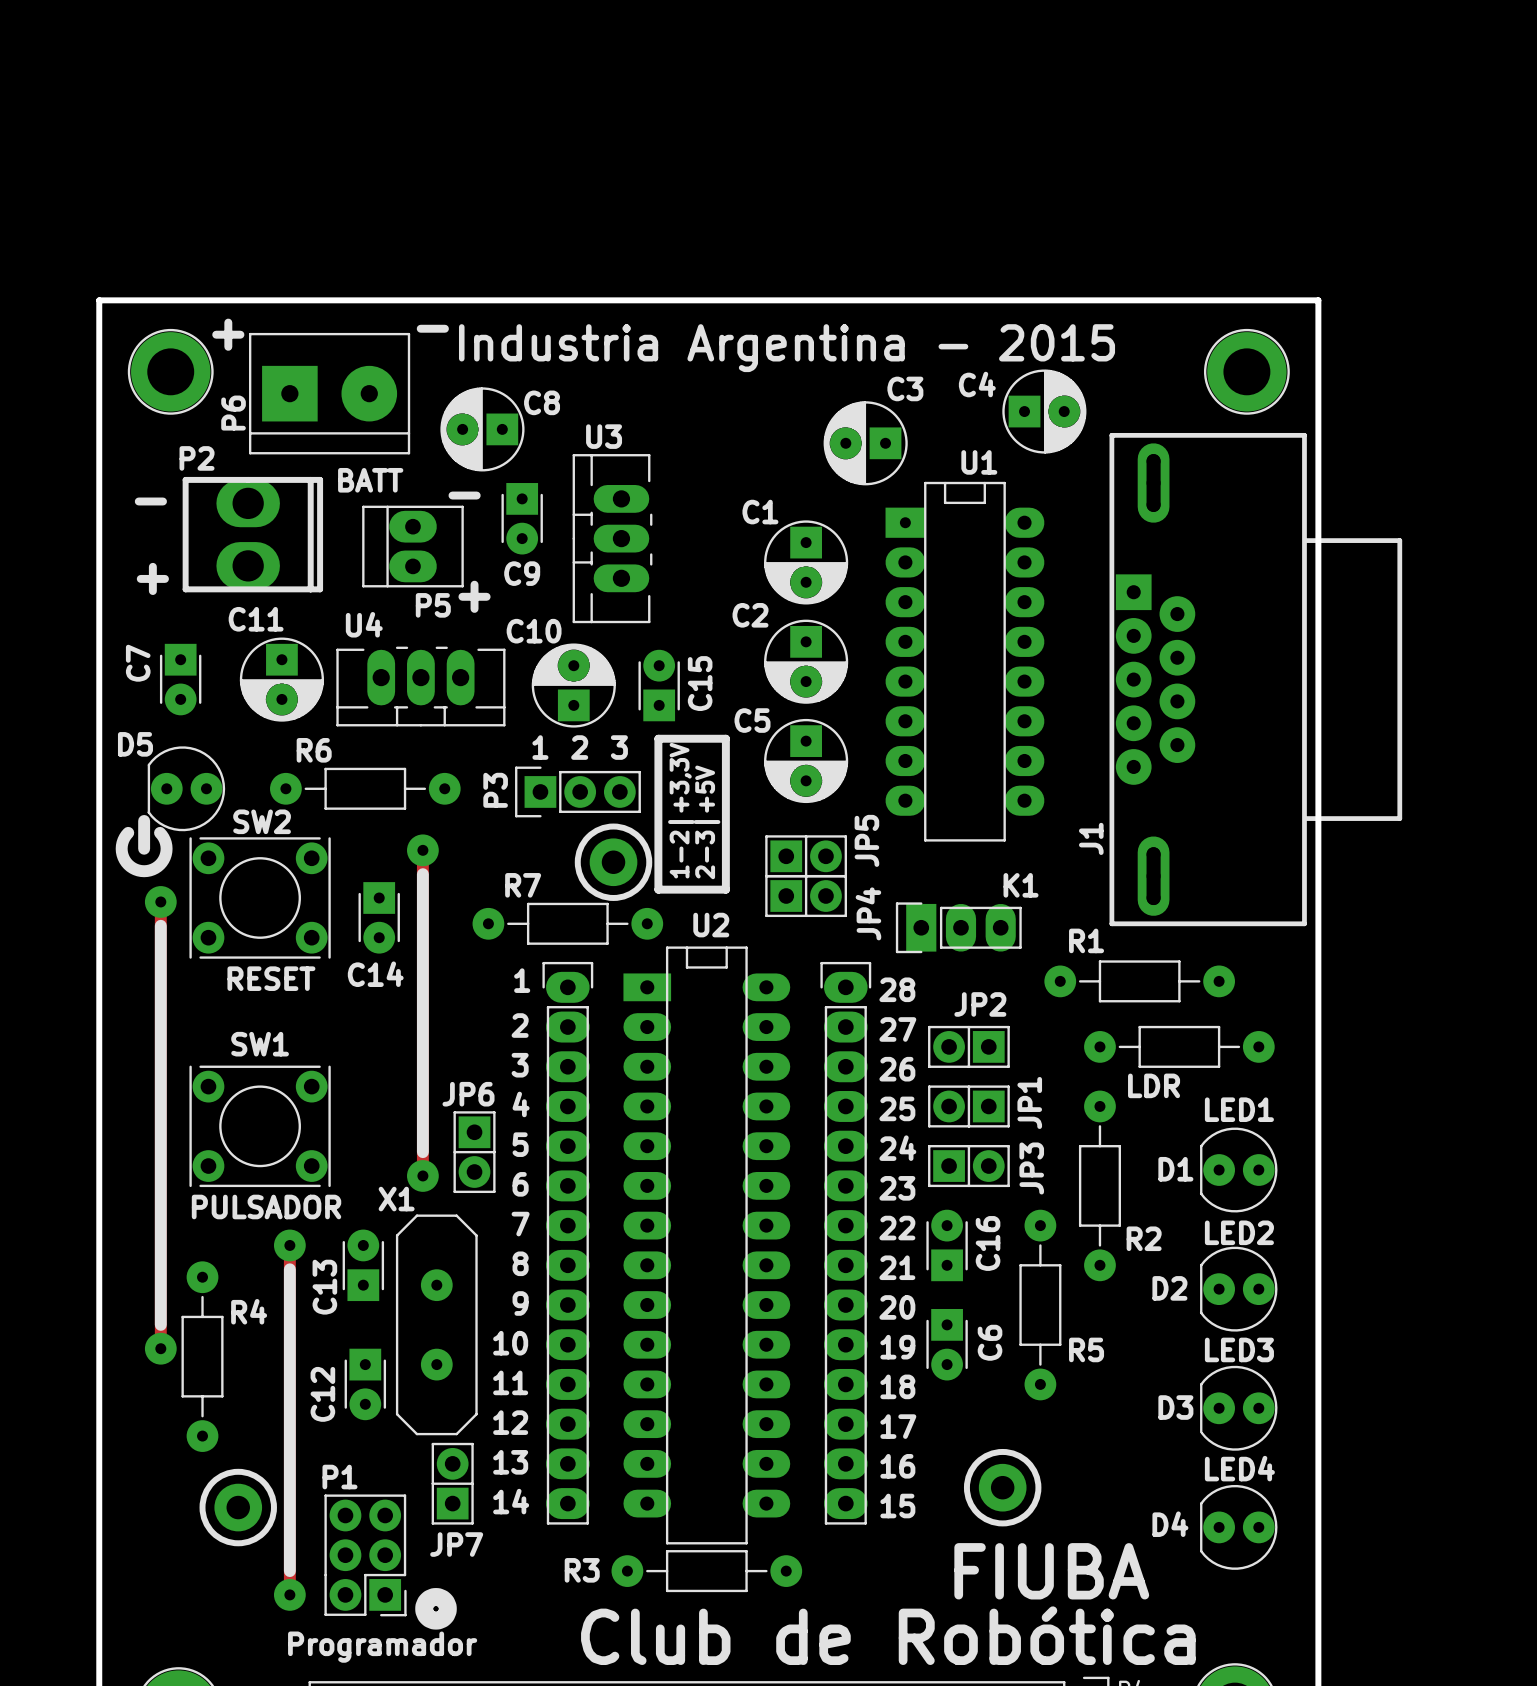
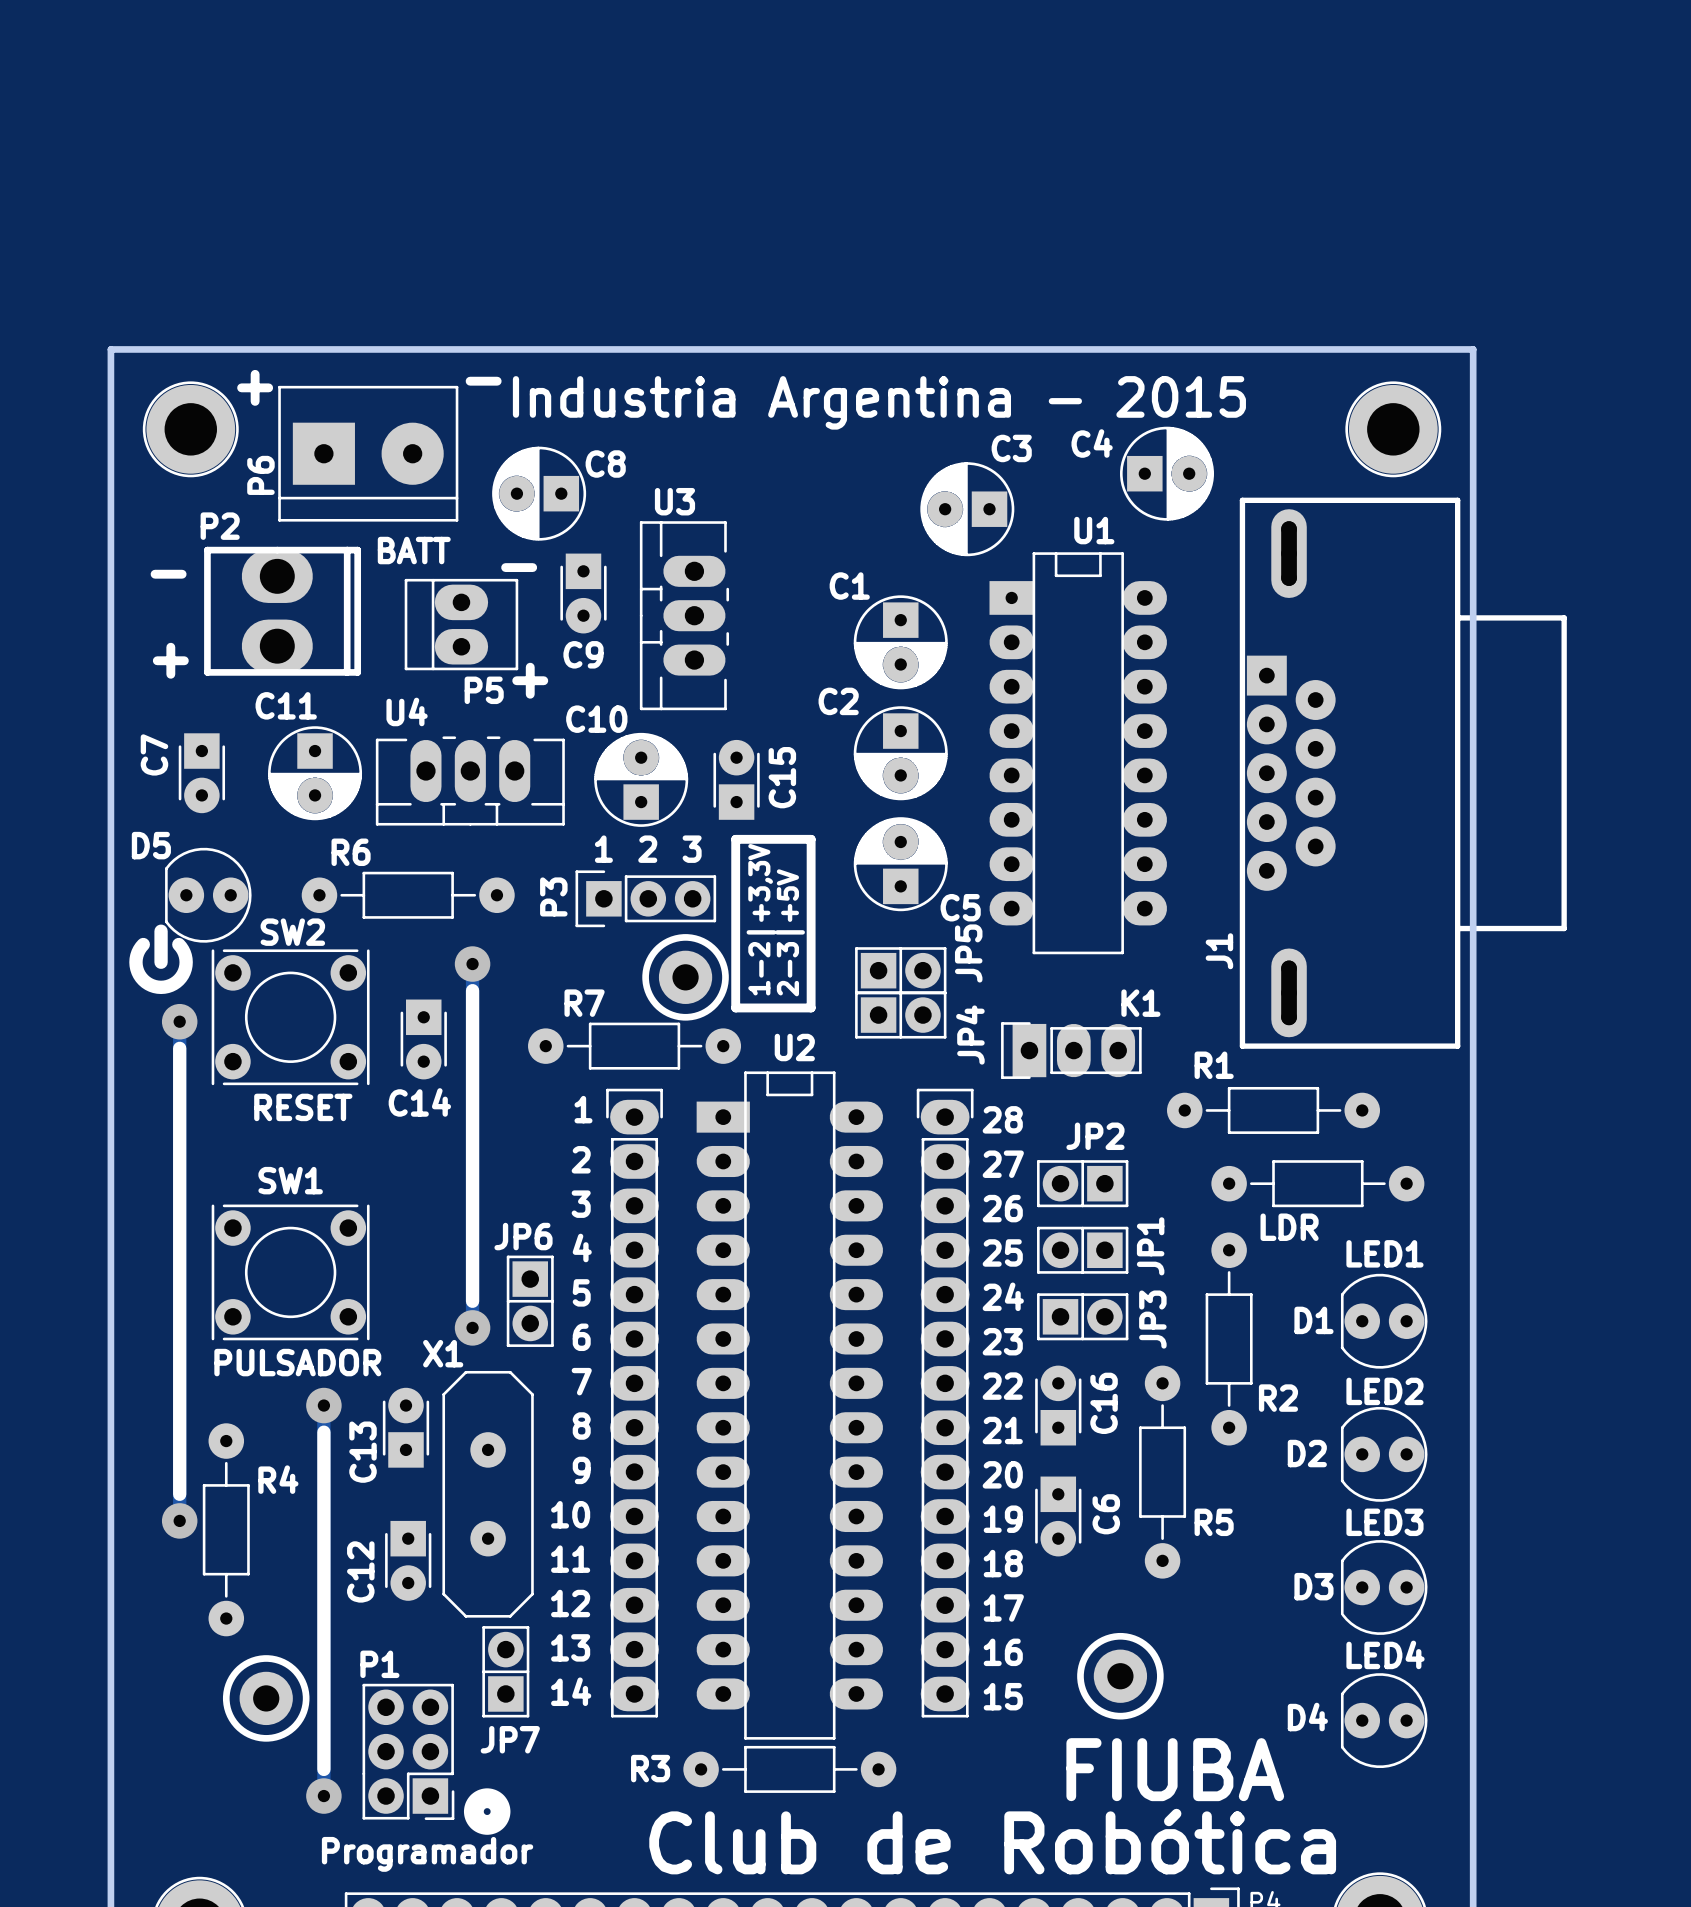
C5 rotation: 0° (806, 760) -> 180° (900, 864)

